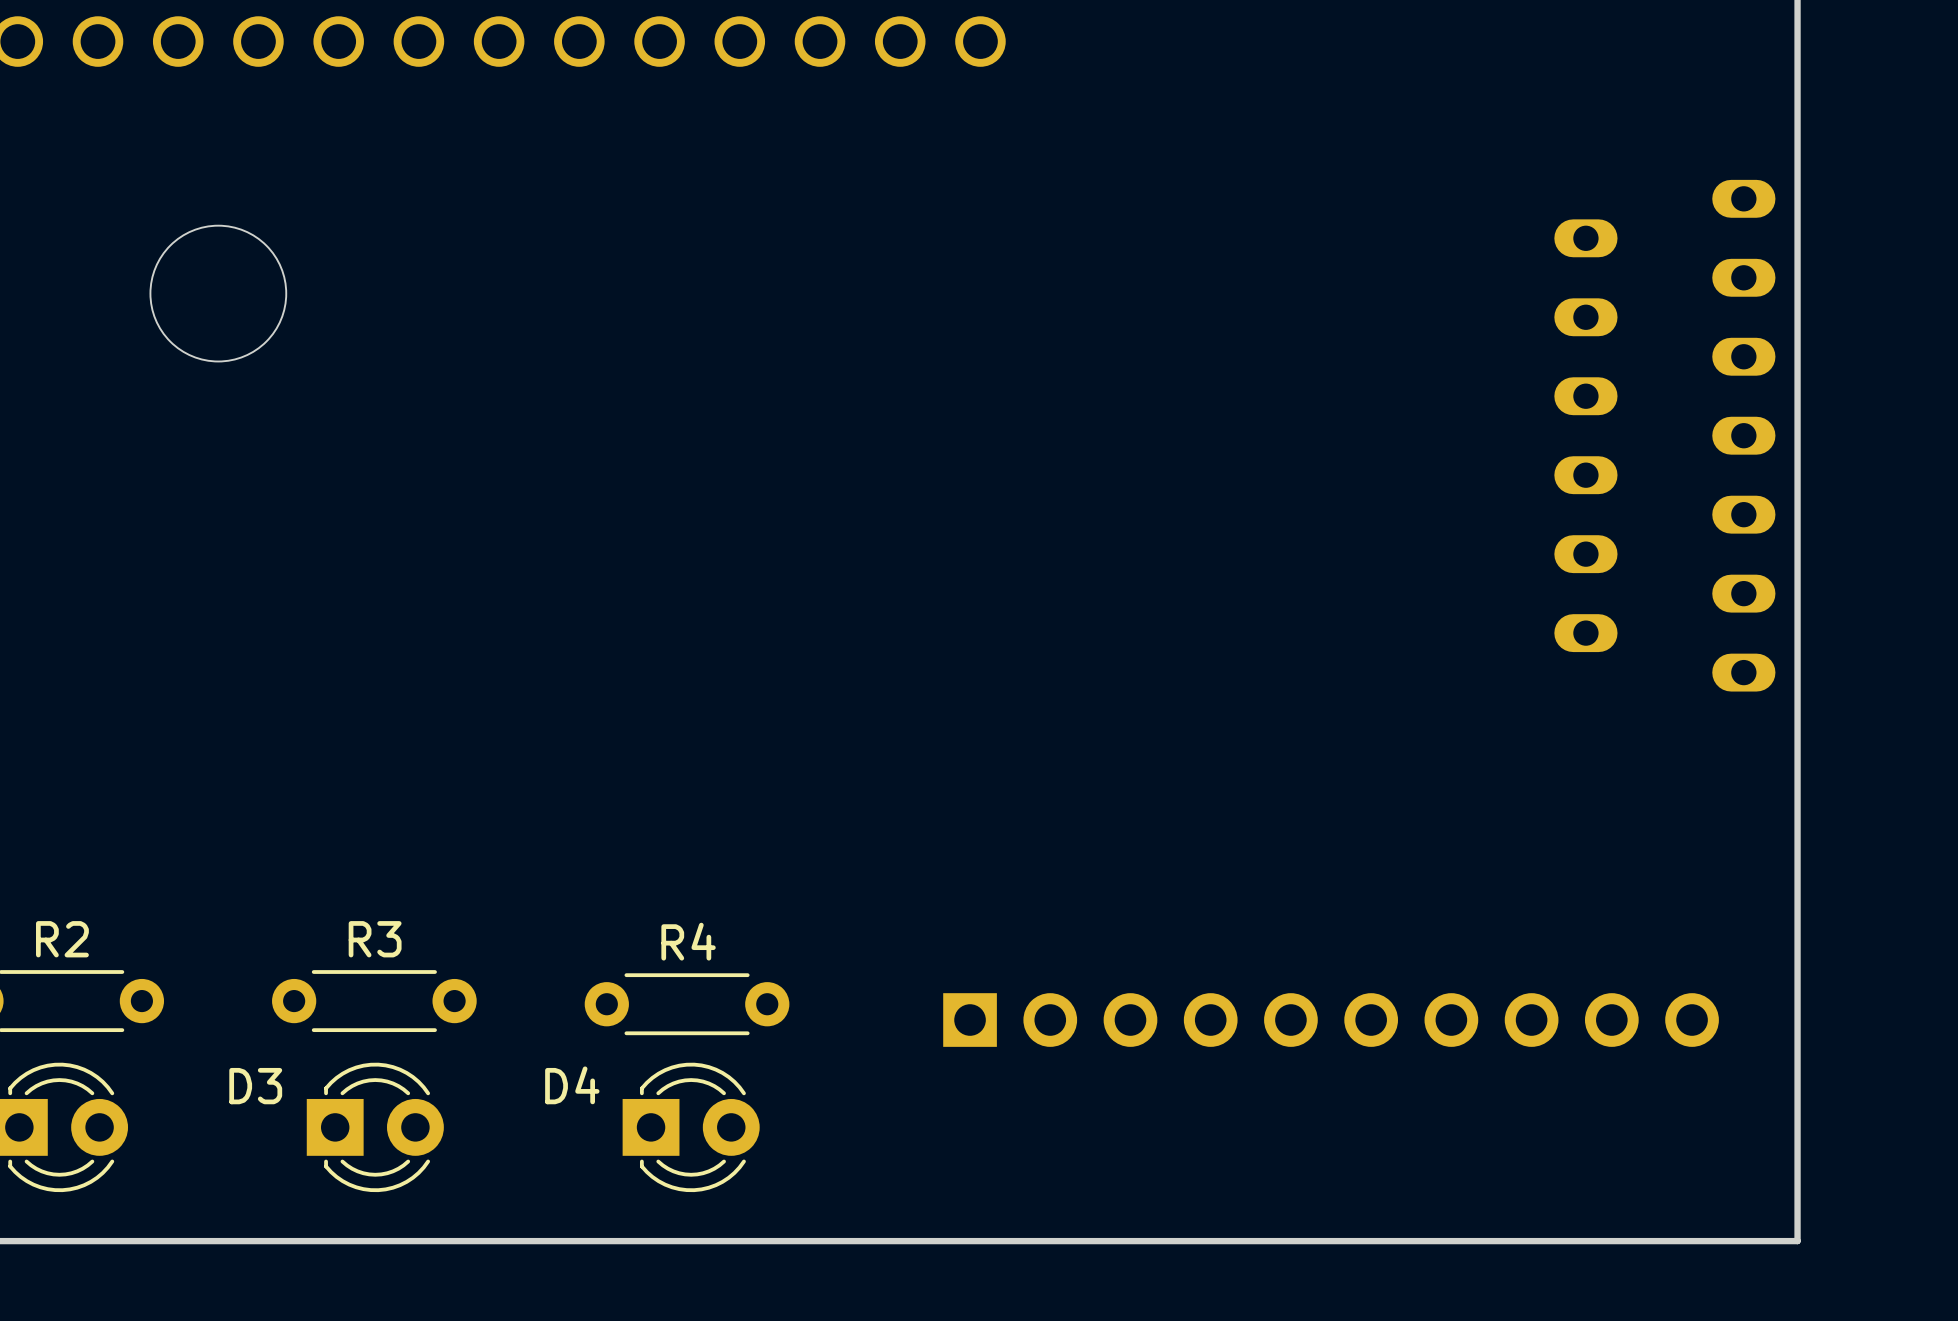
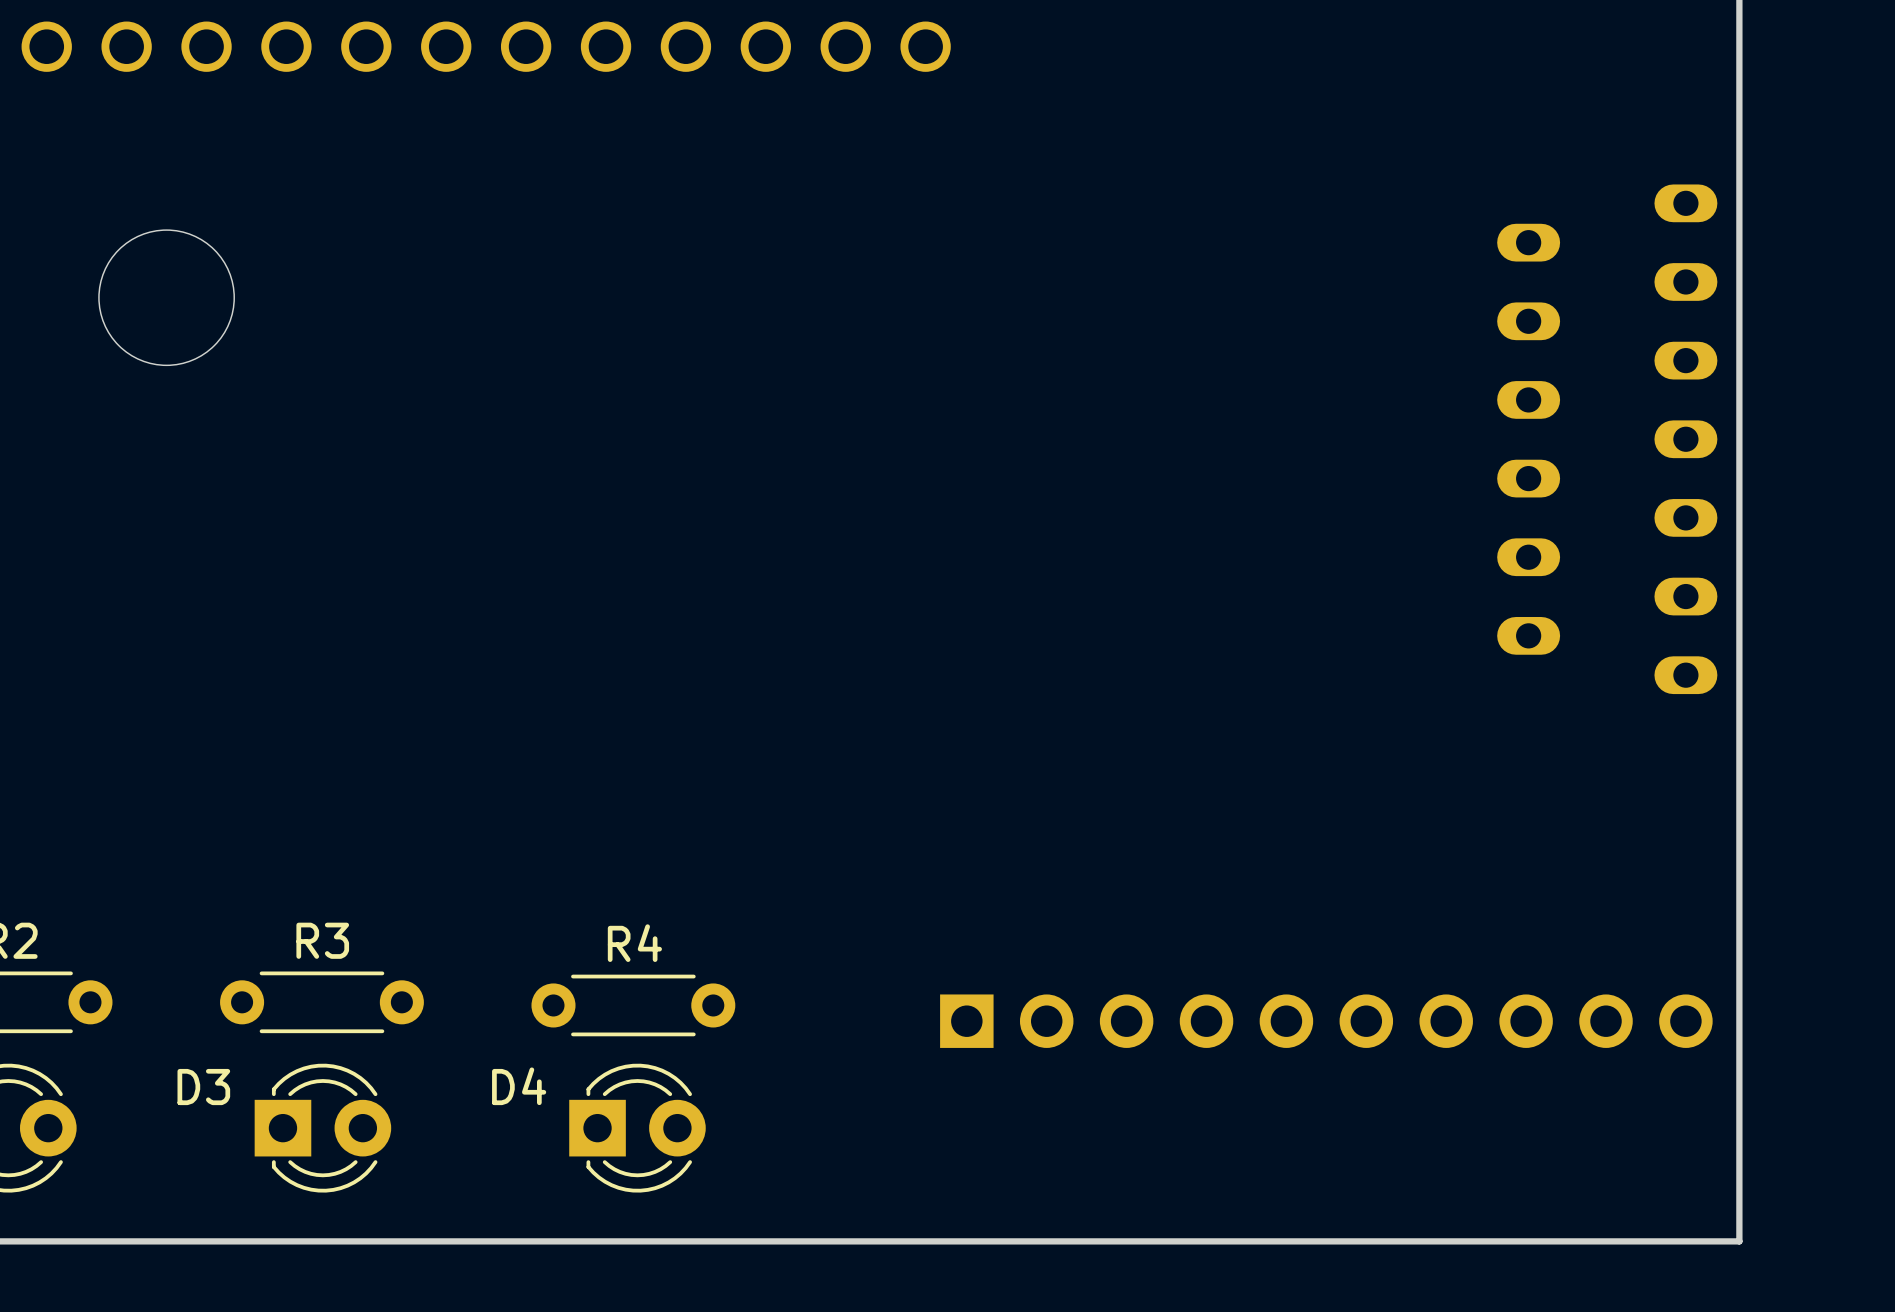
part position: (1331, 1020) -> (1326, 1021)

